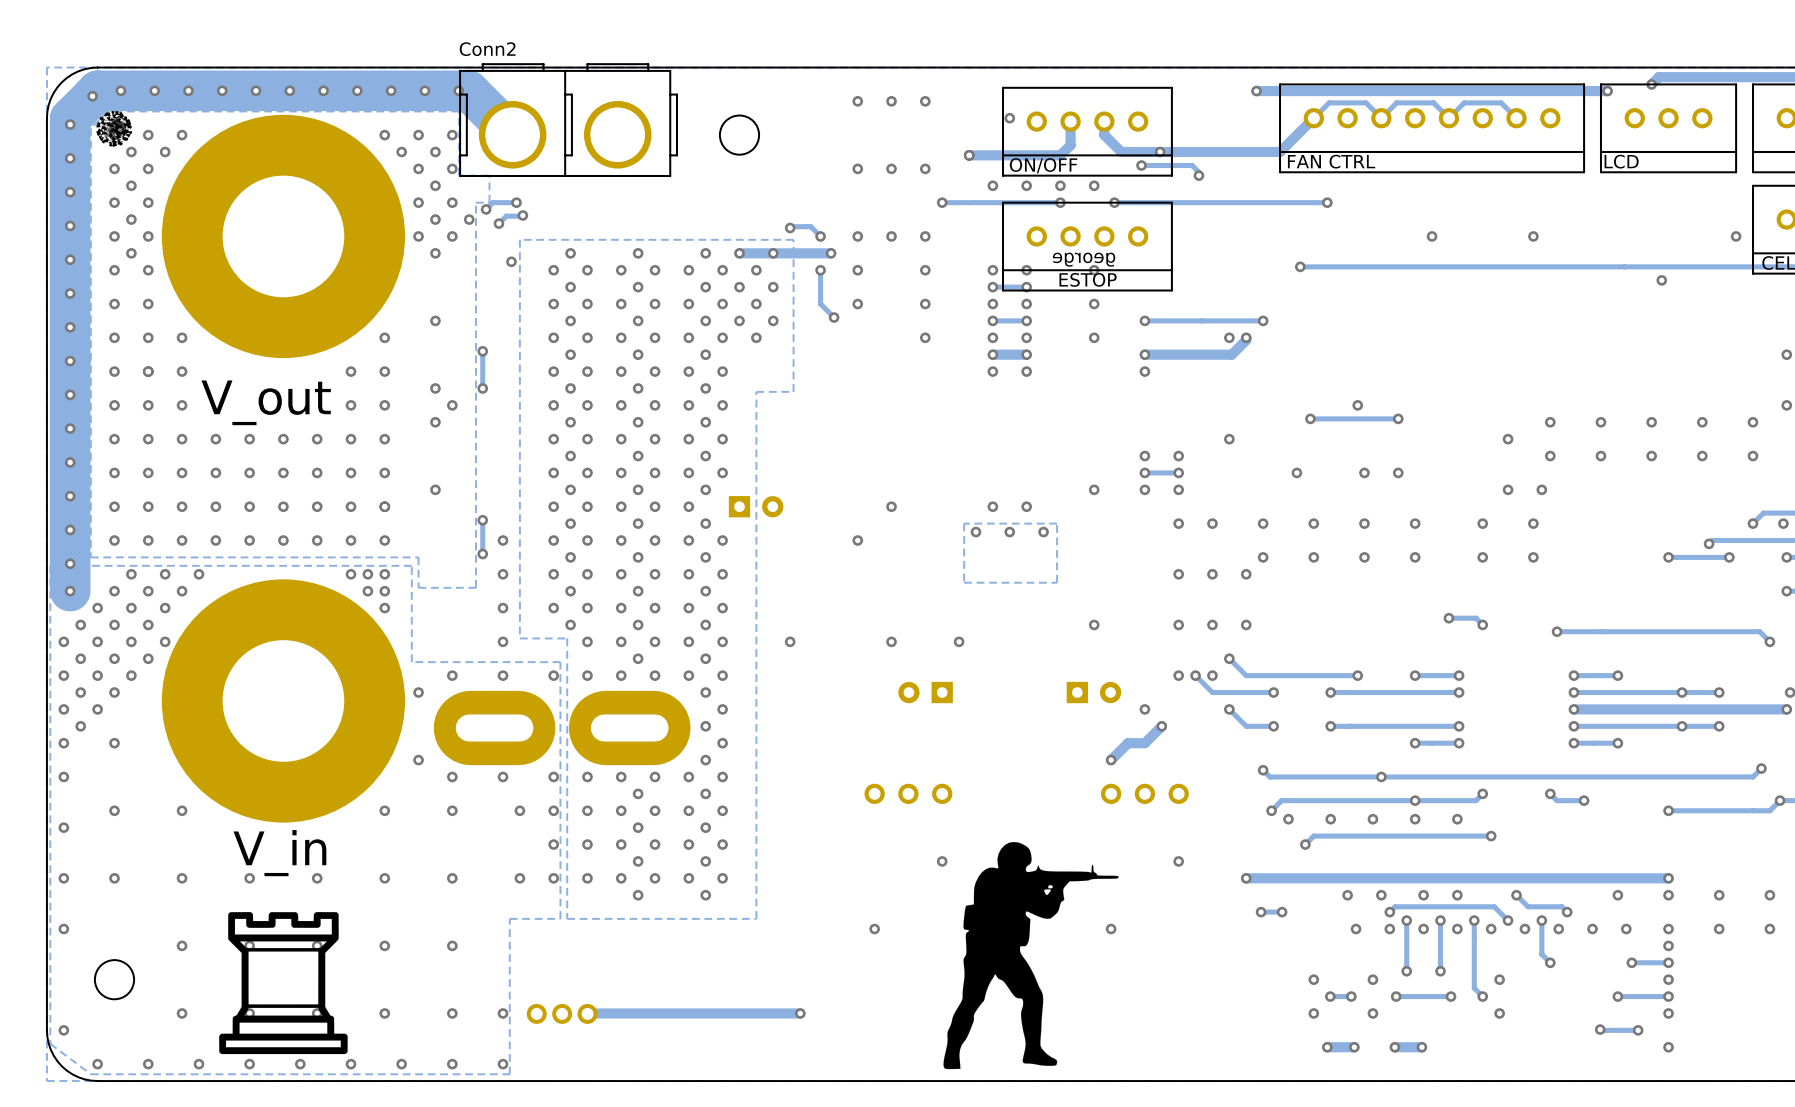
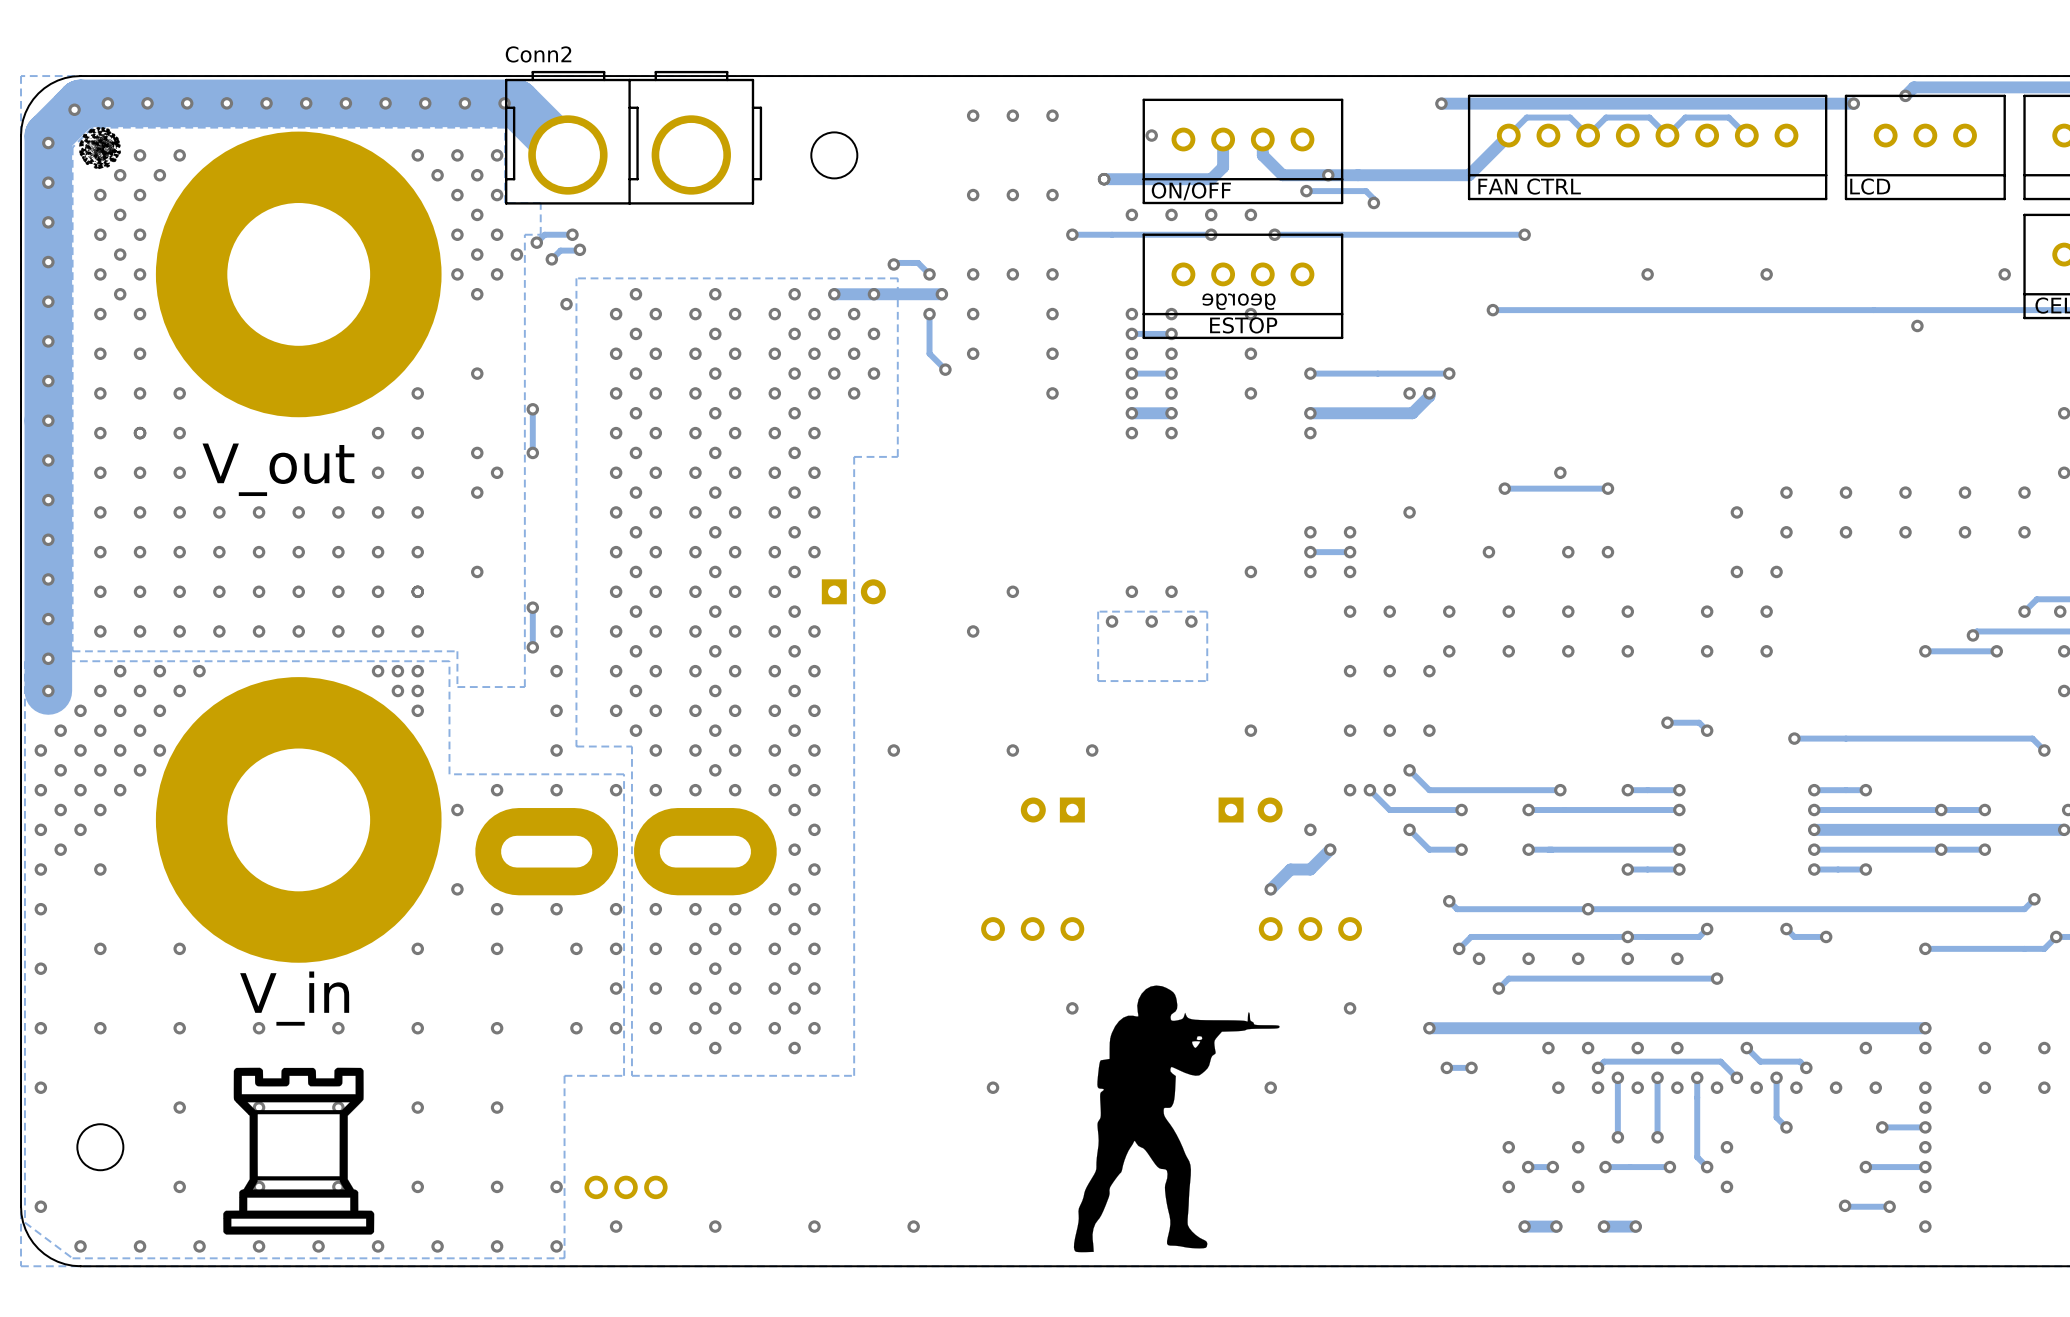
track: (800, 1013) (587, 1013) -> none
via position: (800, 1013) -> (913, 1226)
via: none -> (616, 1226)
via: none -> (715, 1226)
via: none -> (814, 1226)

